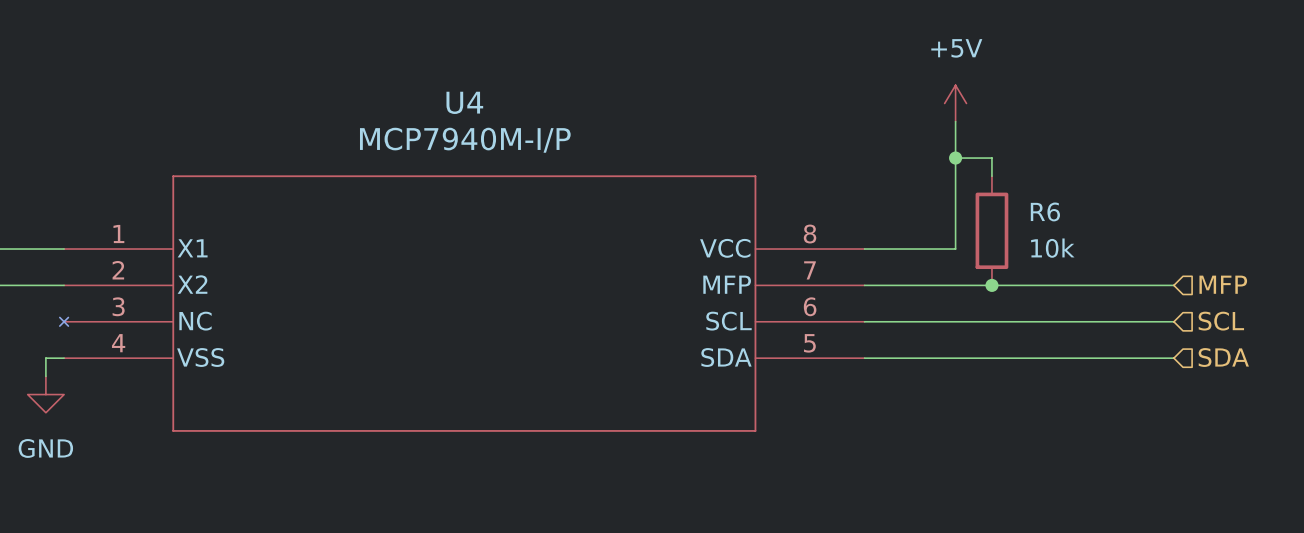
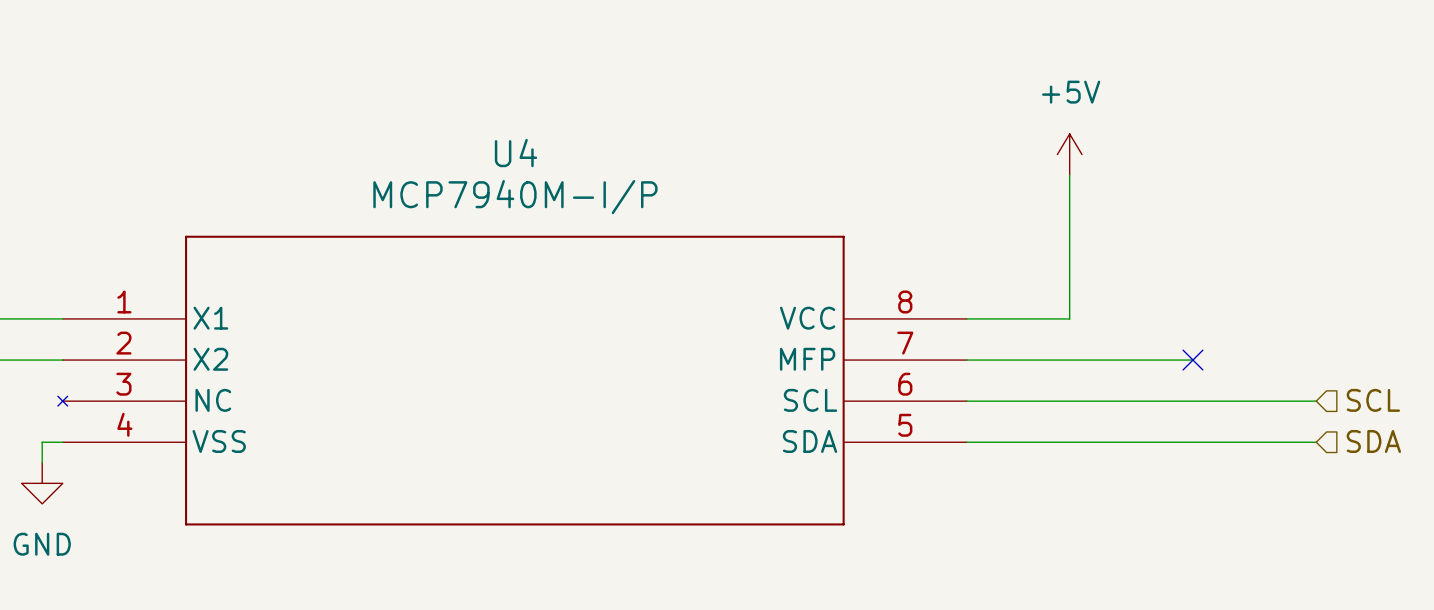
wire: (955, 158) (991, 158) (991, 176) -> none
junction: (955, 158) -> none
R6: 10k (991, 230) -> none
hierarchical label: MFP (1223, 284) -> none
junction: (991, 285) -> none
wire: (1064, 285) (1173, 285) -> none
no-connect mark: none -> (1192, 360)

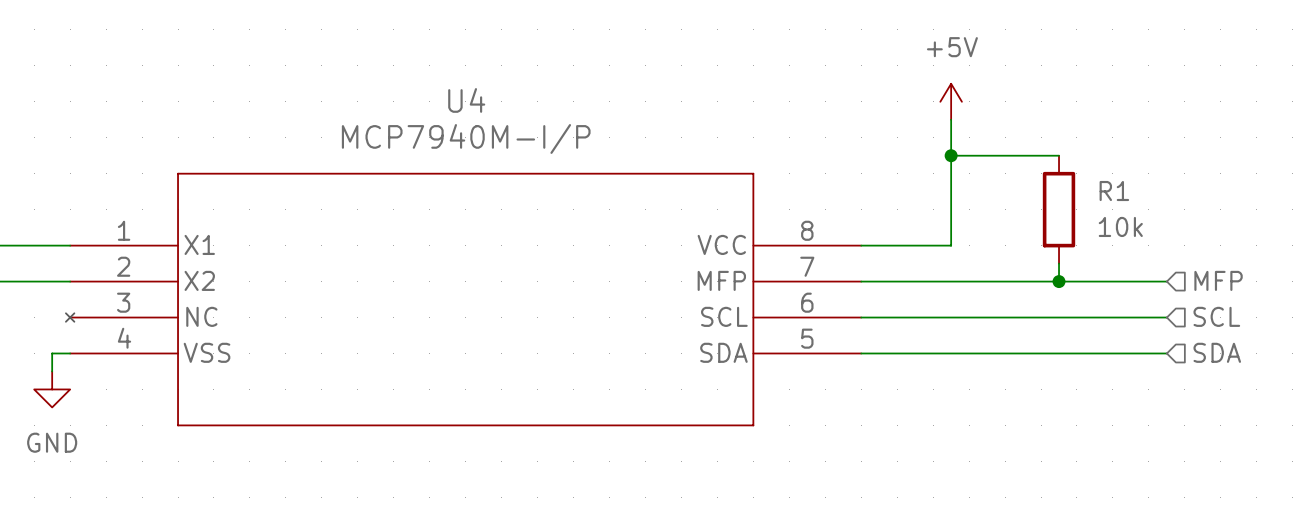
wire: none -> (951, 155) (1059, 155)
junction: none -> (951, 155)
R1: none -> 10k (1059, 209)
wire: none -> (1059, 263) (1059, 281) (1166, 281)
hierarchical label: none -> MFP (1218, 280)
no-connect mark: (1192, 360) -> none
junction: none -> (1059, 281)

